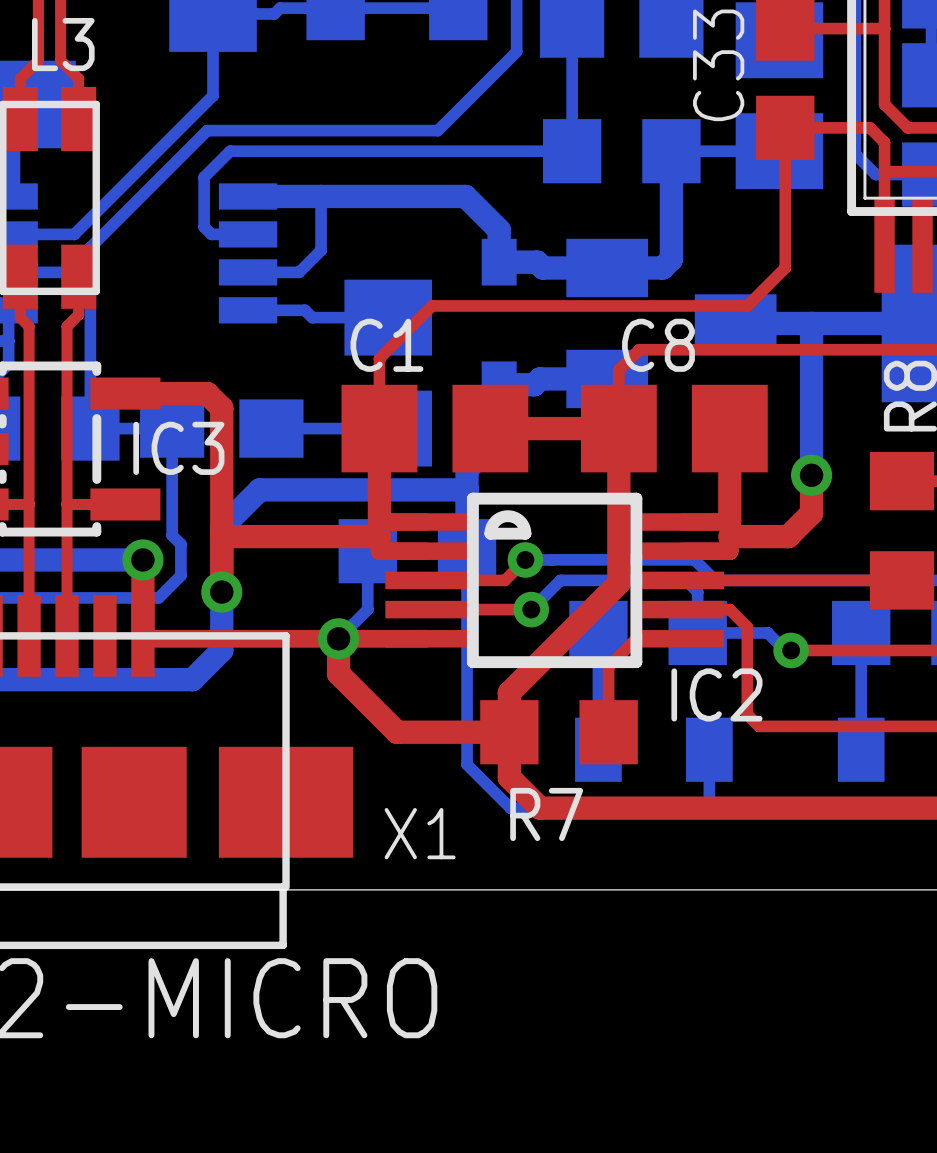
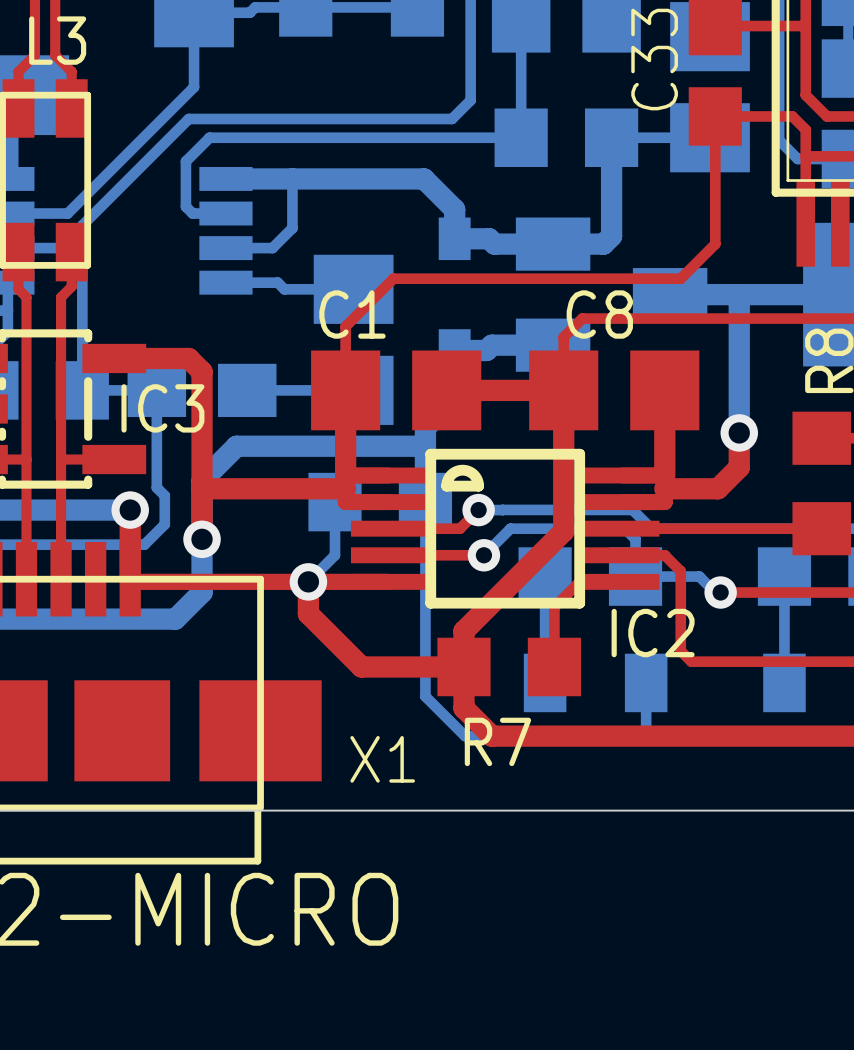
bottom track: (516, 51) (437, 130) -> (470, 47) (470, 100) (452, 118) (398, 118)

